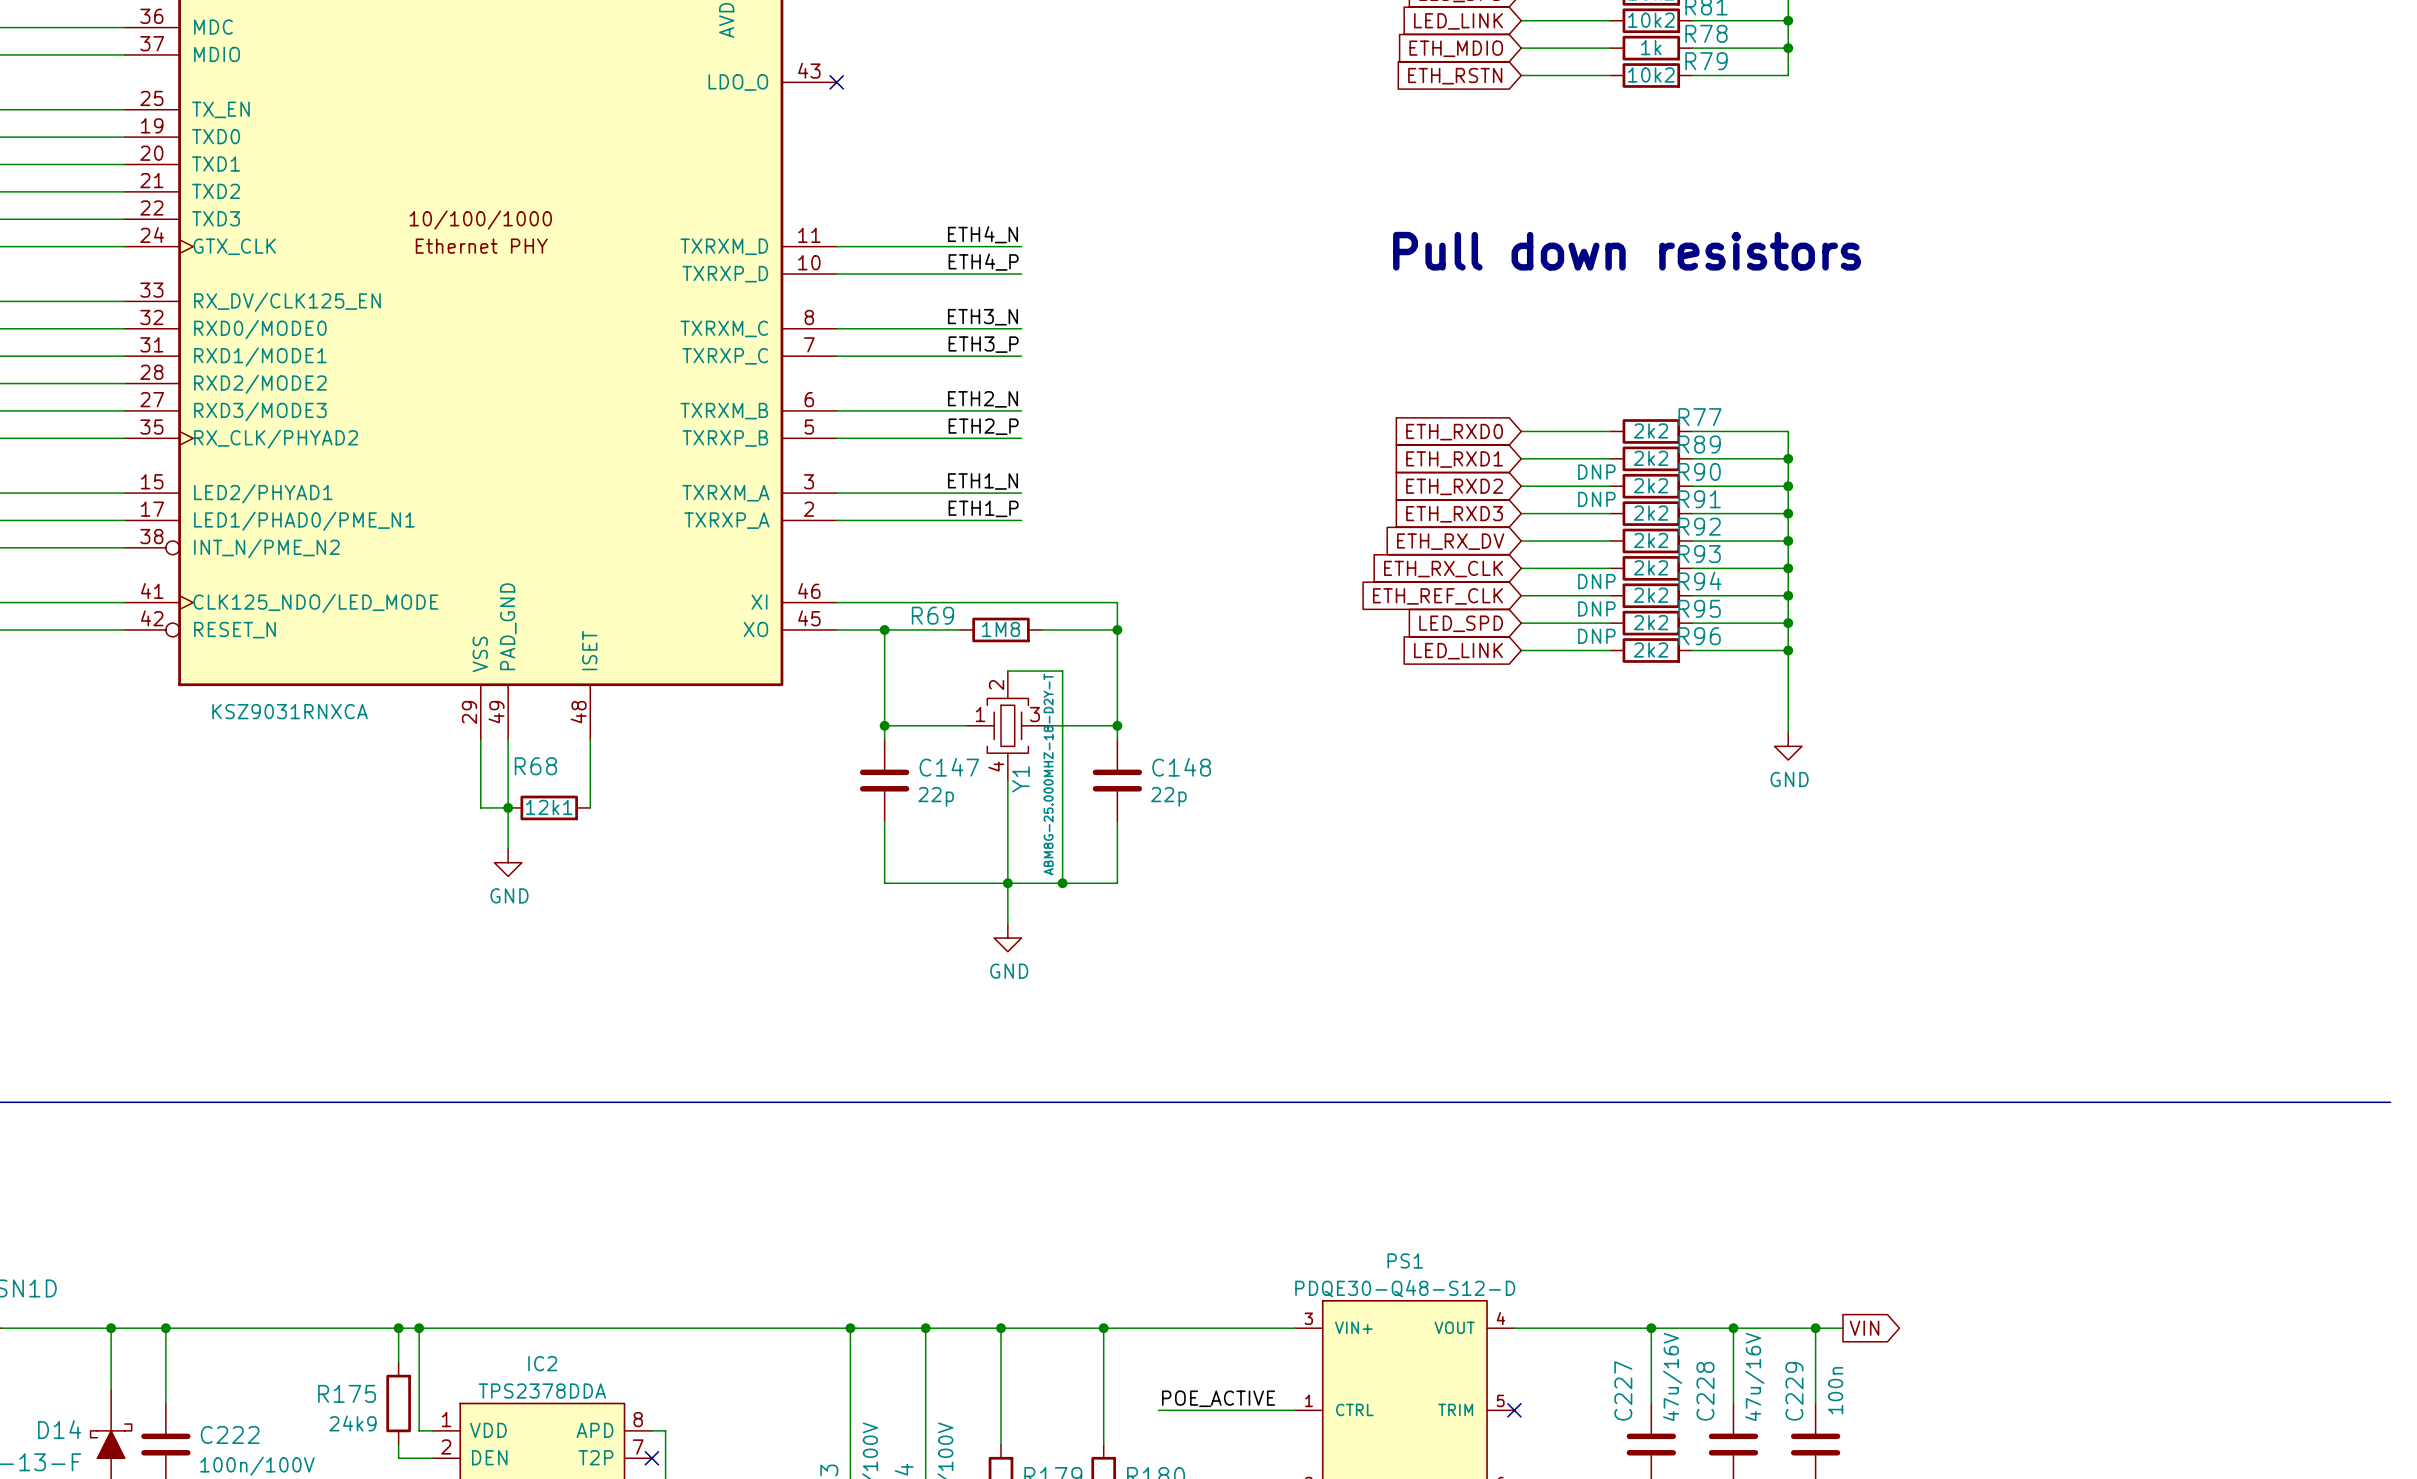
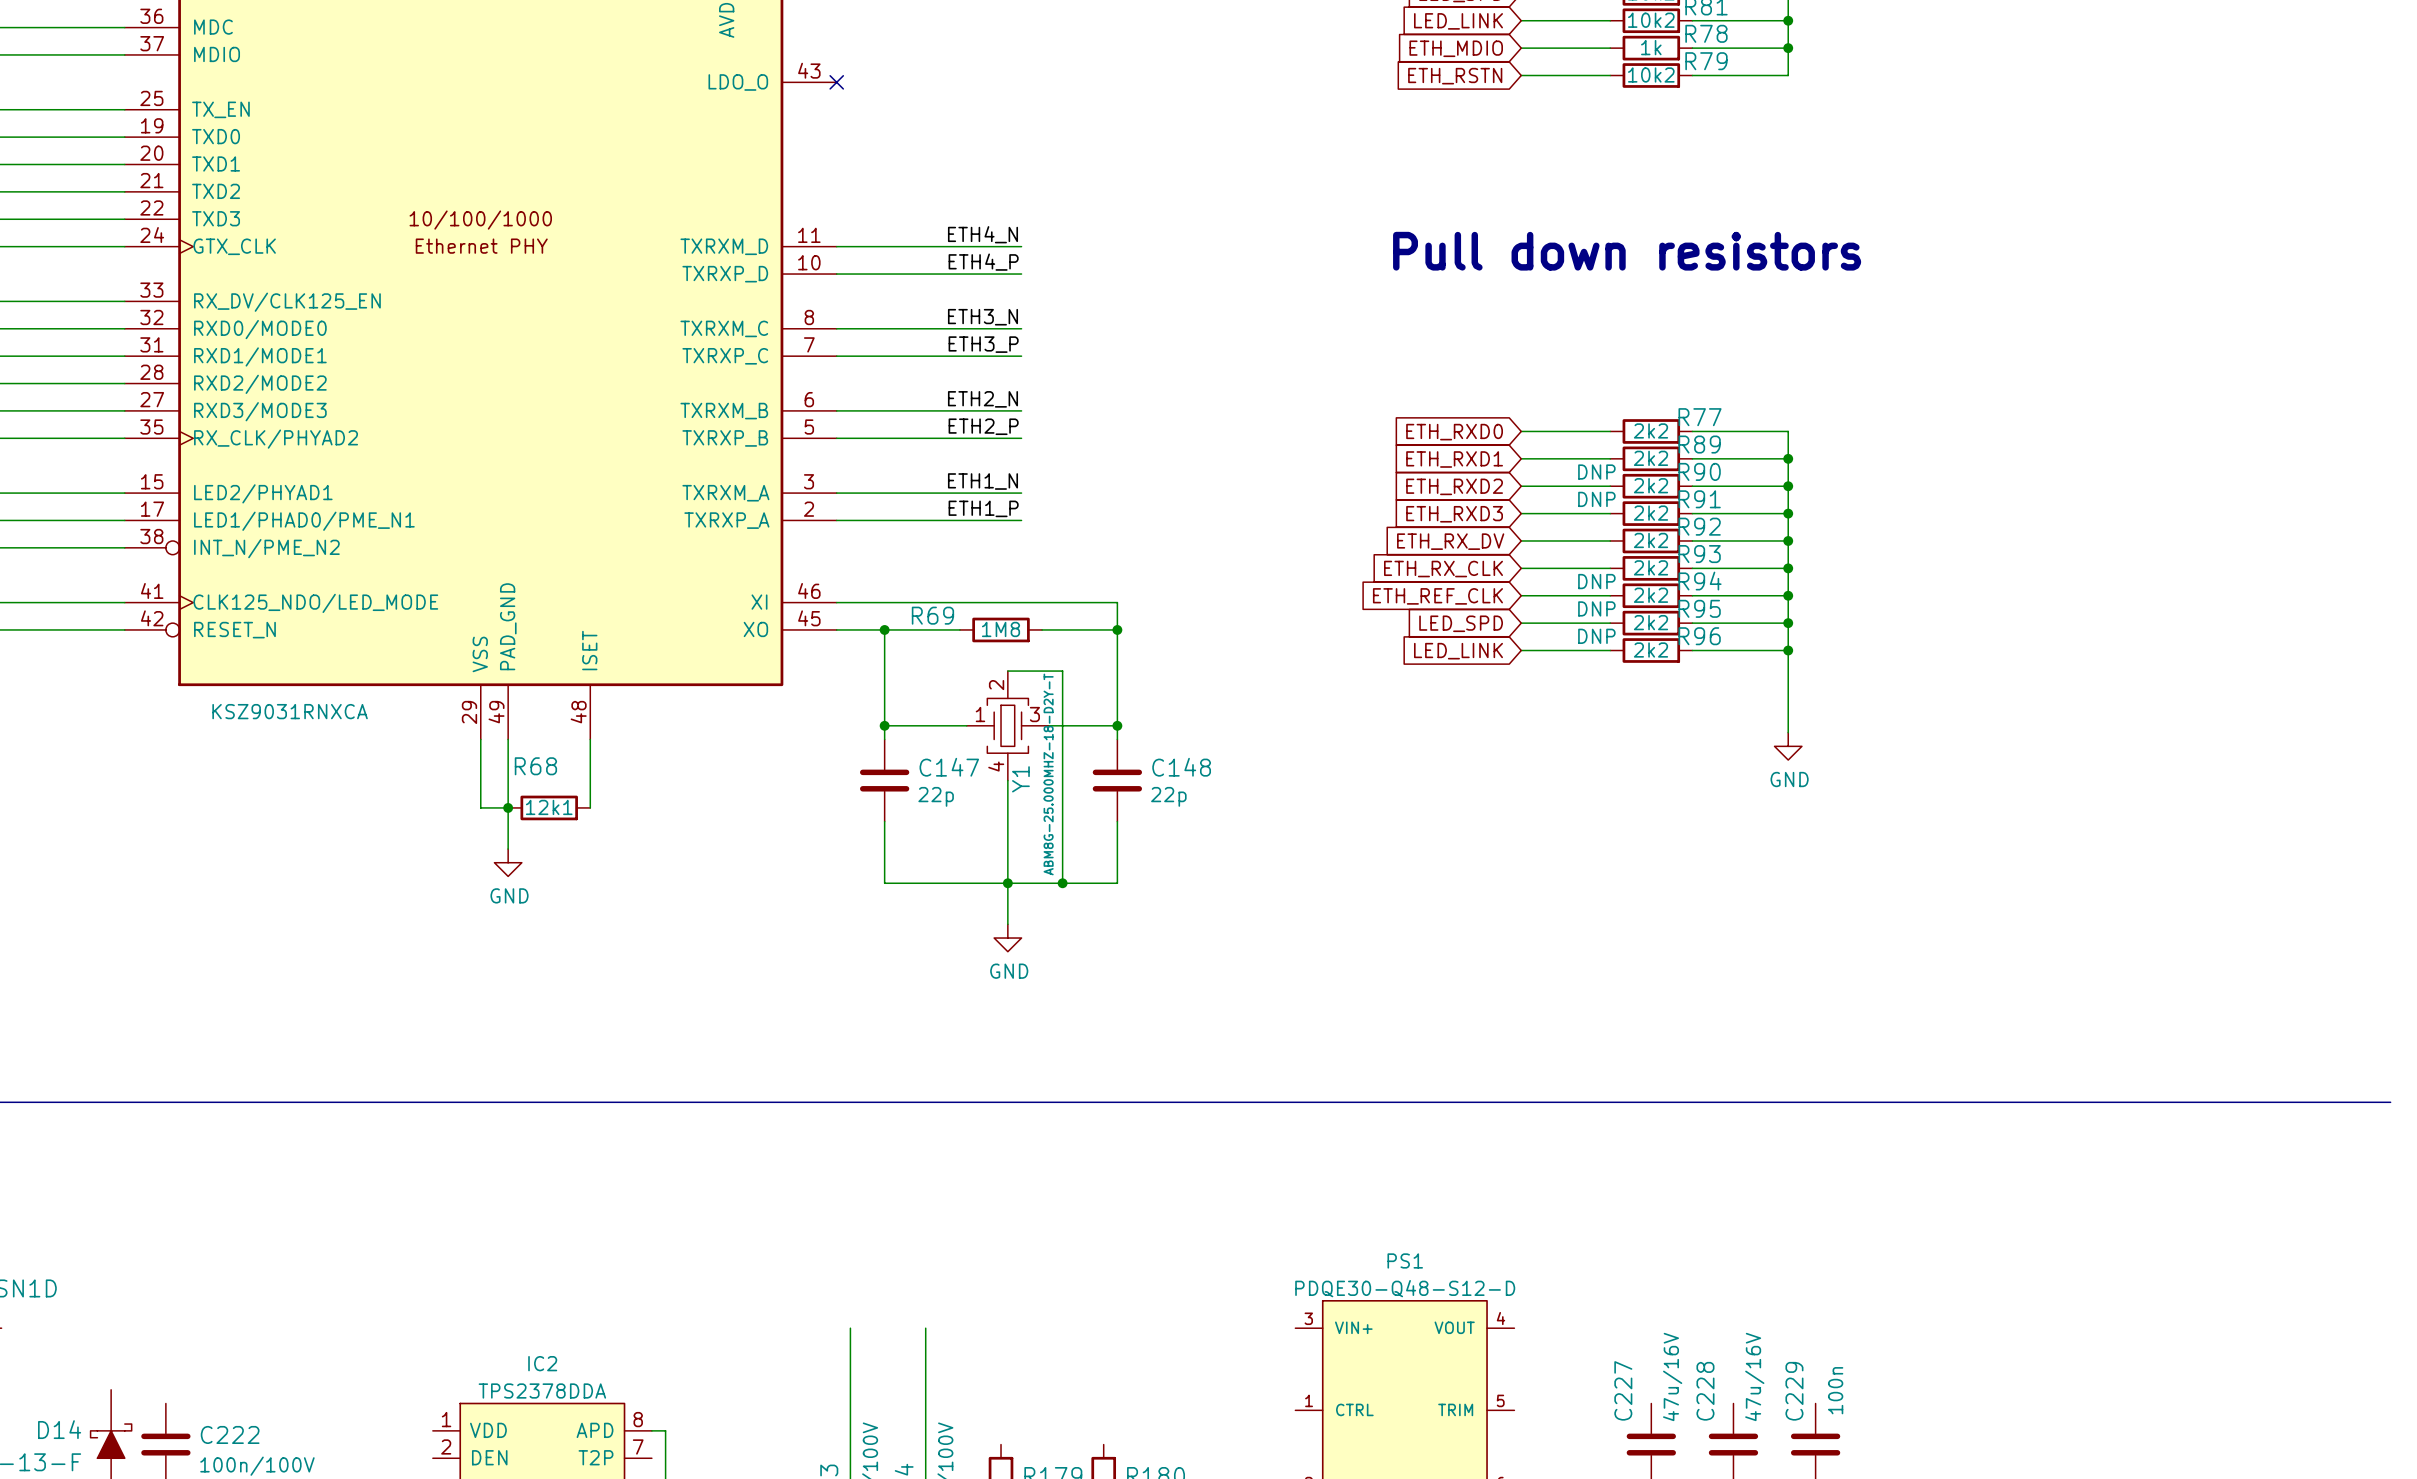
wire: (1, 1328) (1295, 1328) -> none
wire: (111, 1328) (111, 1389) -> none
junction: (111, 1328) -> none
wire: (165, 1328) (165, 1403) -> none
junction: (165, 1328) -> none
wire: (398, 1328) (398, 1362) -> none
junction: (398, 1328) -> none
wire: (419, 1328) (419, 1430) (432, 1430) -> none
junction: (419, 1328) -> none
junction: (850, 1328) -> none
junction: (925, 1328) -> none
wire: (1001, 1328) (1001, 1444) -> none
junction: (1001, 1328) -> none
wire: (1103, 1328) (1103, 1444) -> none
junction: (1103, 1328) -> none
wire: (1514, 1328) (1842, 1328) -> none
wire: (1651, 1328) (1651, 1403) -> none
junction: (1651, 1328) -> none
wire: (1733, 1328) (1733, 1403) -> none
junction: (1733, 1328) -> none
wire: (1815, 1328) (1815, 1403) -> none
junction: (1815, 1328) -> none
global label: VIN (1864, 1328) -> none
label: POE_ACTIVE (1218, 1398) -> none
R175: (398, 1403) -> none
wire: (1158, 1410) (1295, 1410) -> none
no-connect mark: (1514, 1410) -> none
wire: (398, 1444) (398, 1458) (432, 1458) -> none
no-connect mark: (651, 1458) -> none

